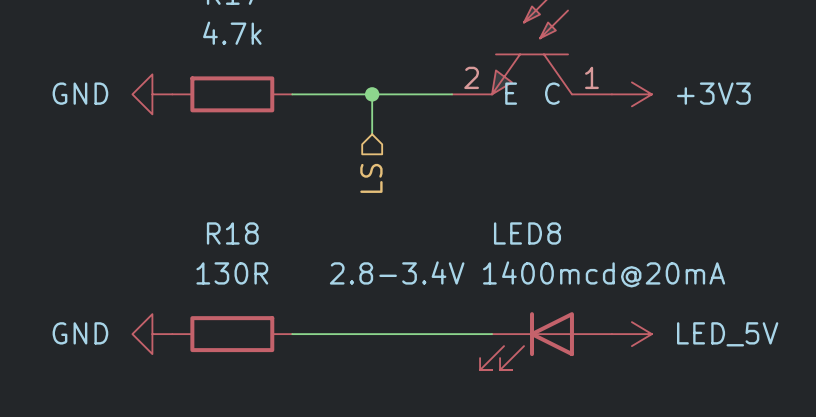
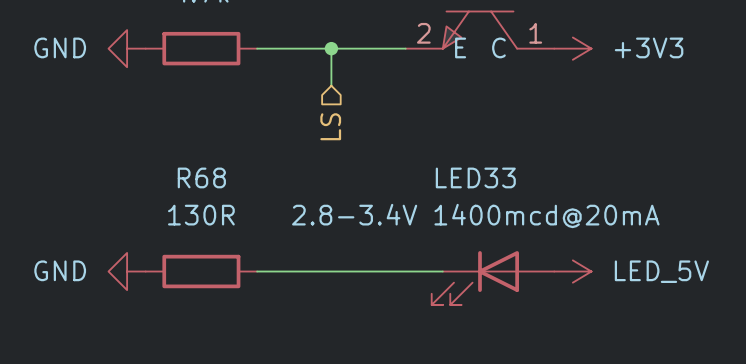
R18 name: R18 (232, 233) -> R68 (201, 177)
LED8 name: LED8 (527, 233) -> LED33 (475, 177)

